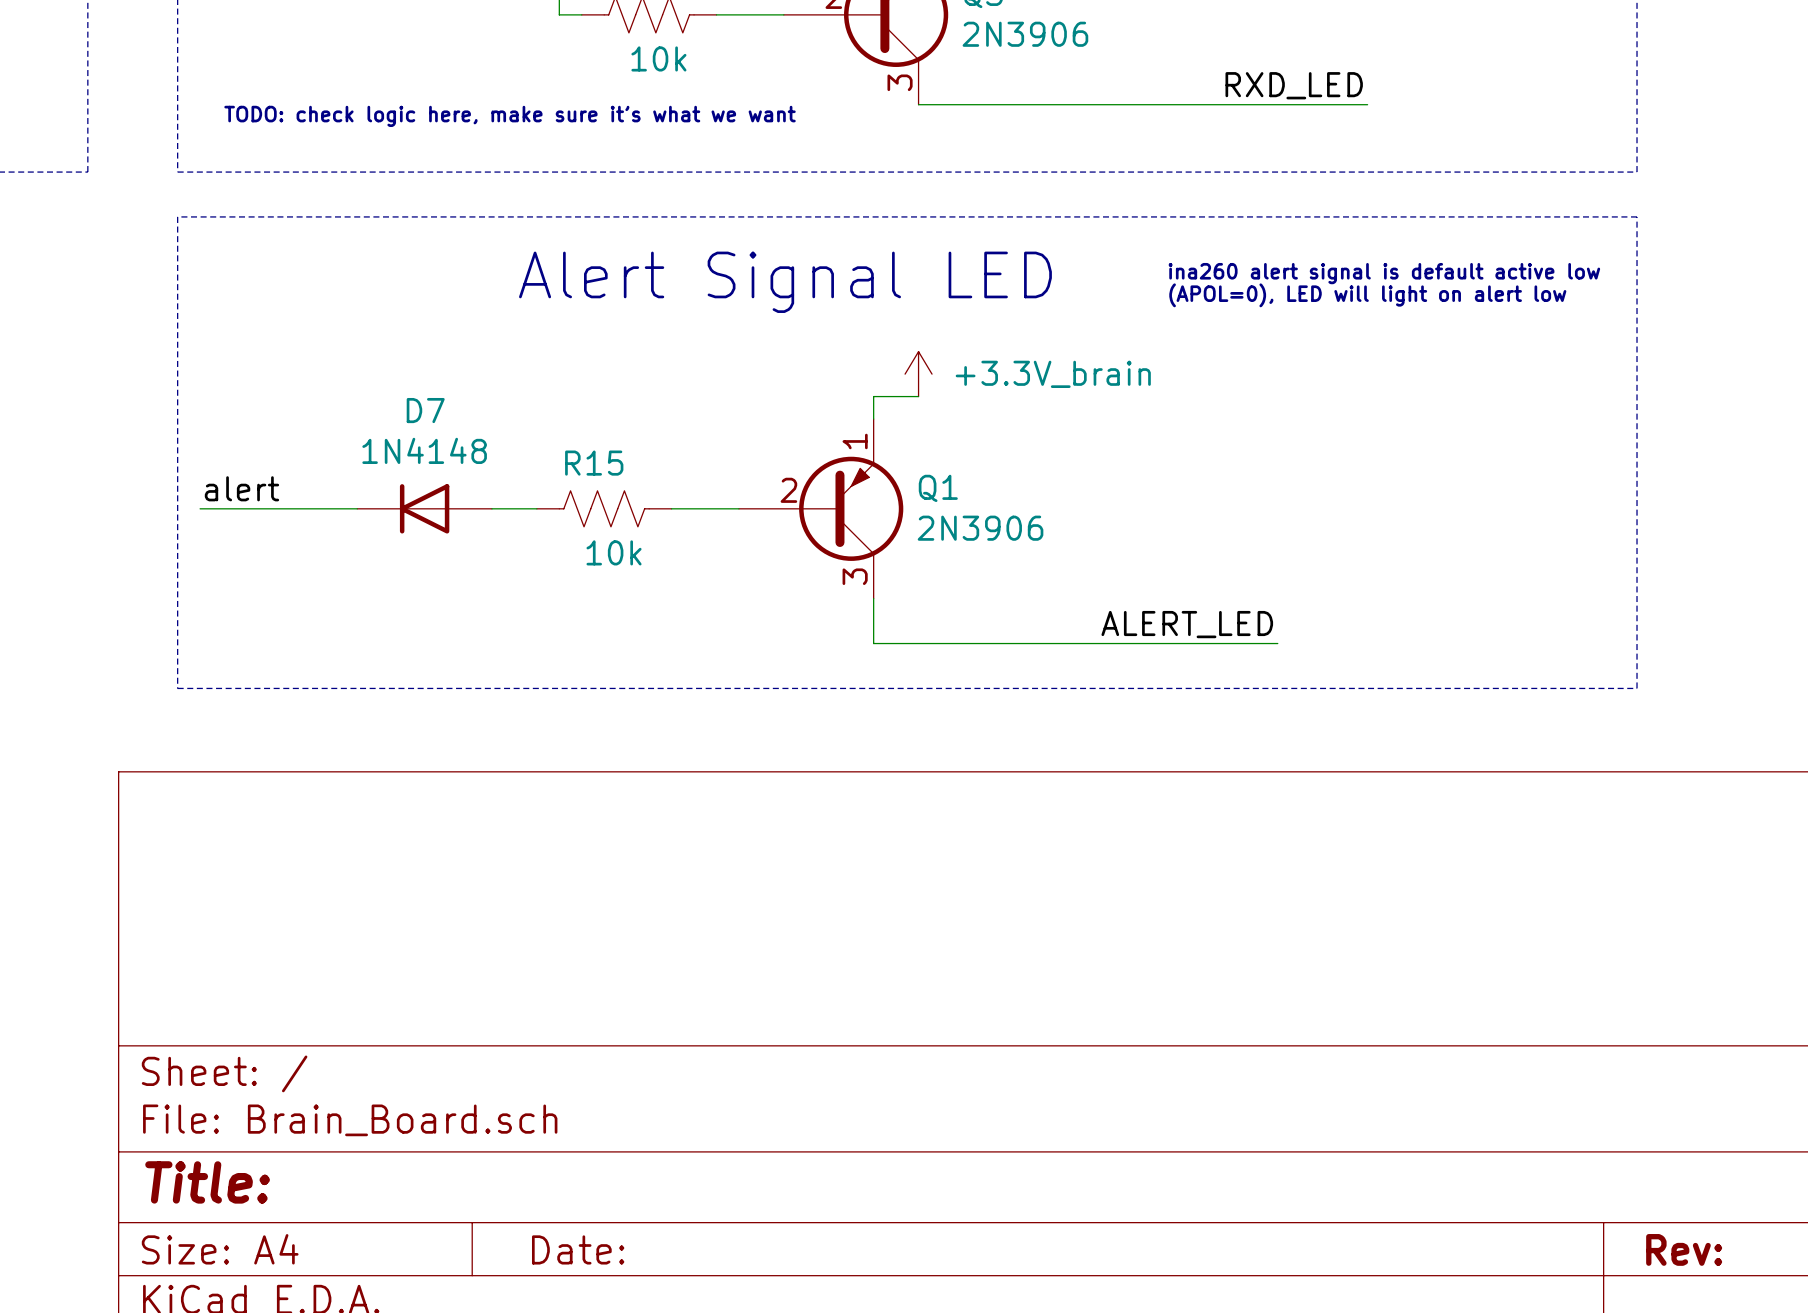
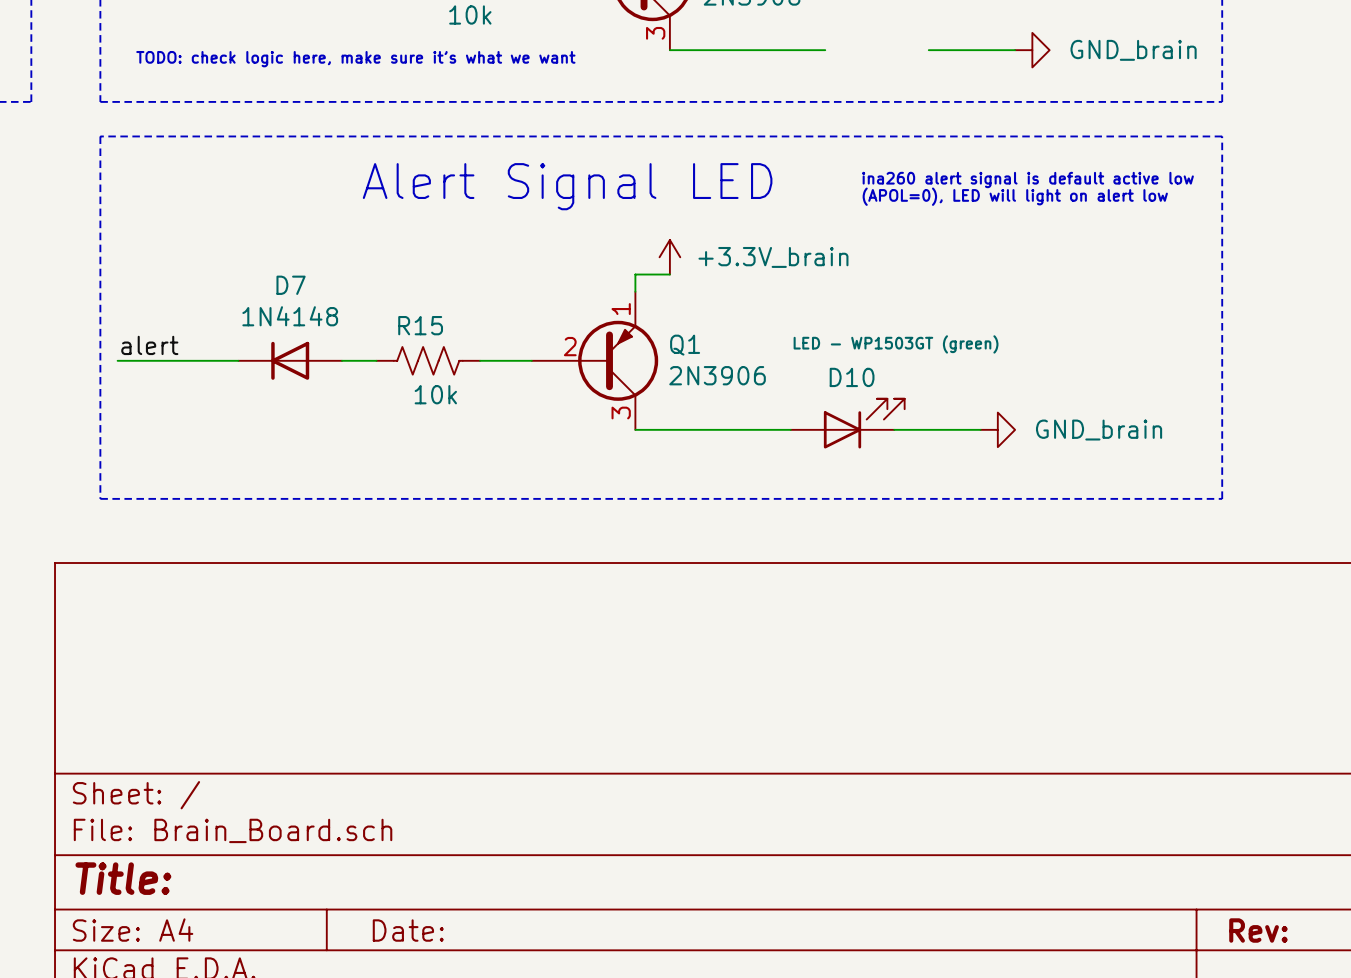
label: RXD_LED (1294, 85) -> none
wire: (1120, 104) (1255, 104) -> none
power symbol: none -> GND_brain (1032, 50)
D10: none -> LED - WP1503GT (green) (847, 423)
wire: (873, 598) (873, 643) (1277, 643) -> (635, 429) (790, 429)
wire: none -> (894, 429) (980, 429)
power symbol: none -> GND_brain (997, 429)
label: ALERT_LED (1187, 624) -> none

